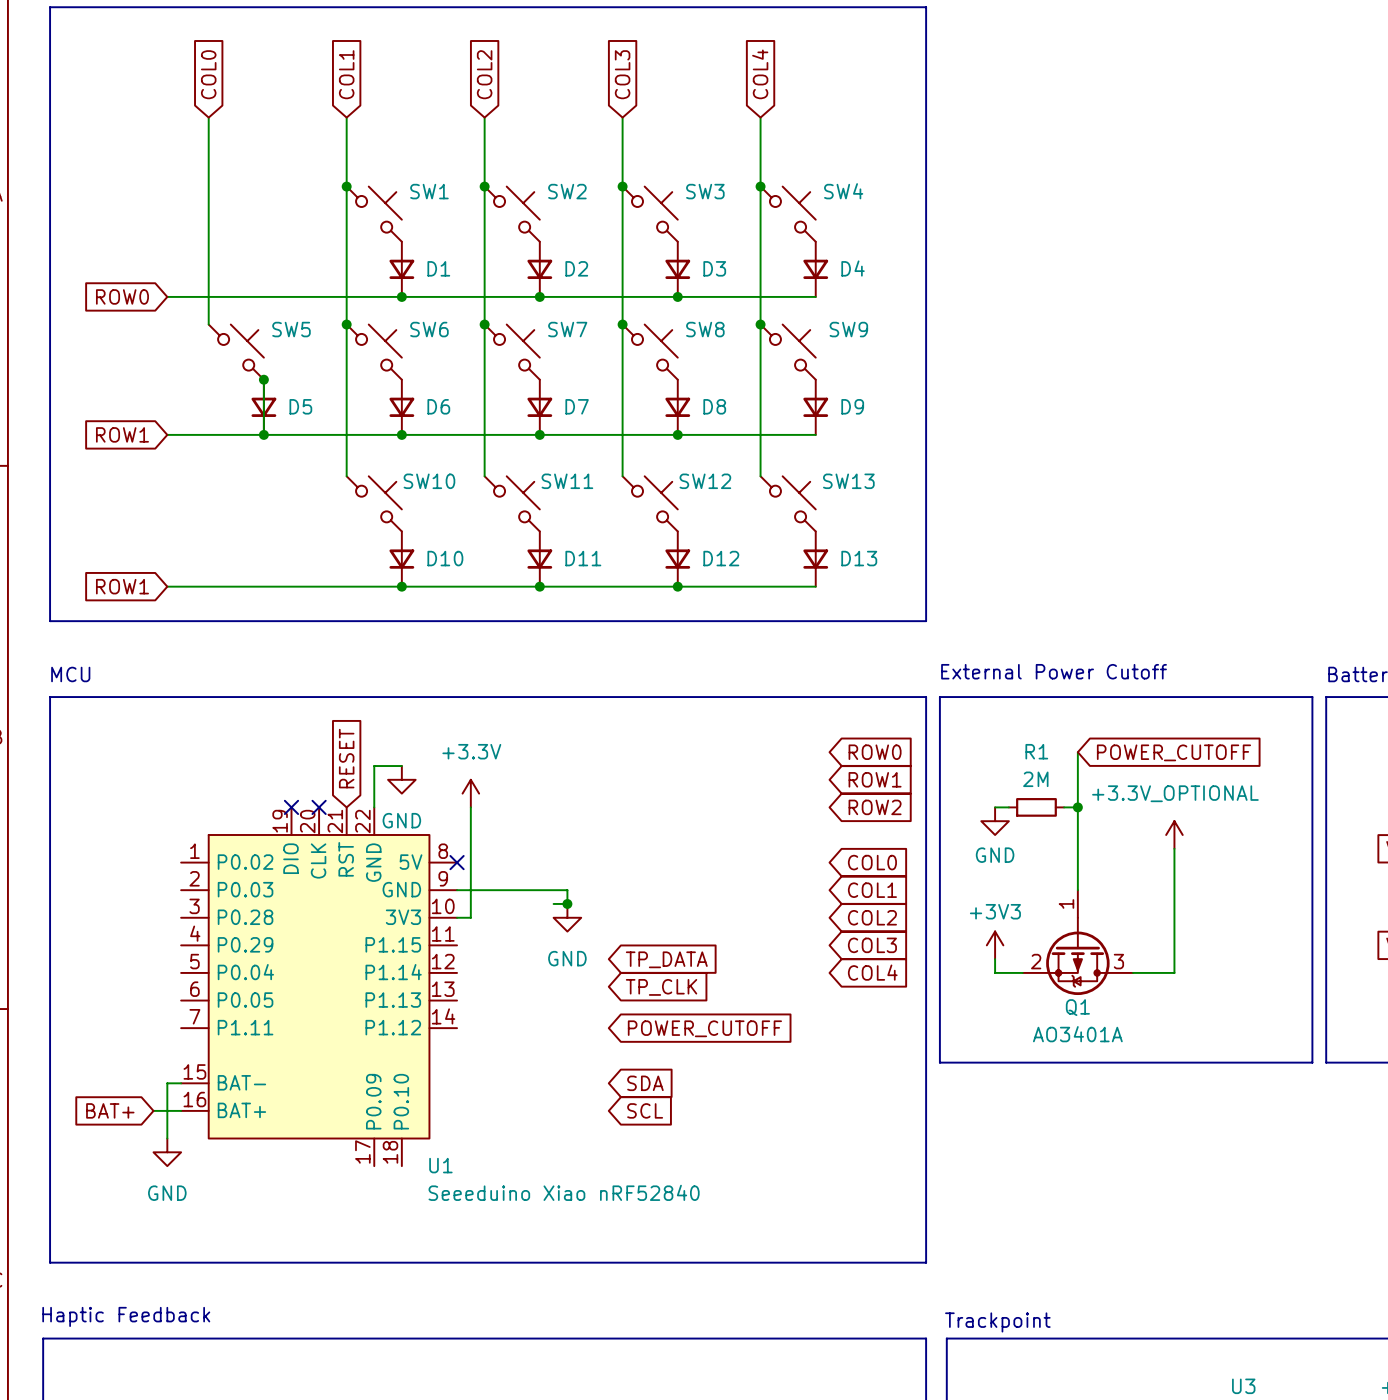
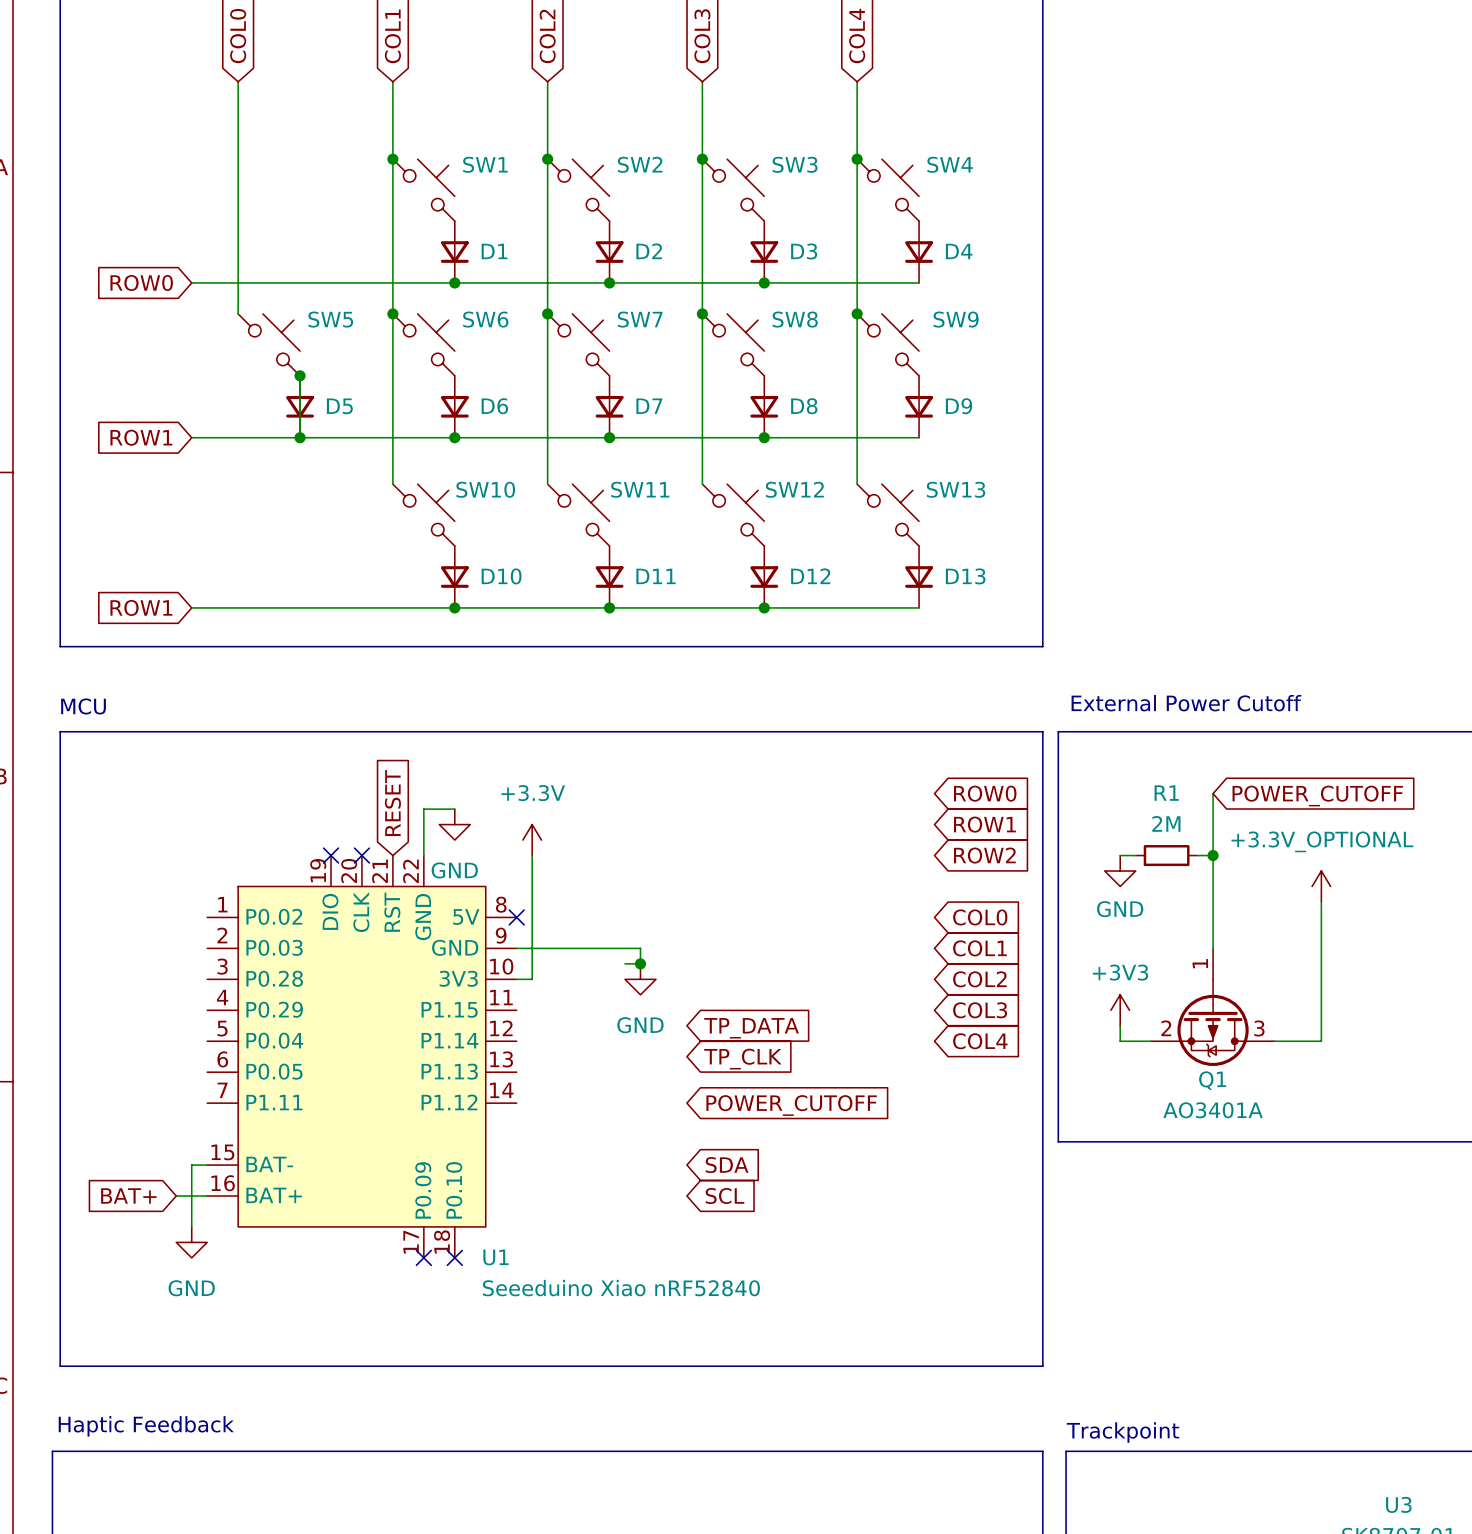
no-connect mark: none -> (423, 1257)
no-connect mark: none -> (454, 1257)

